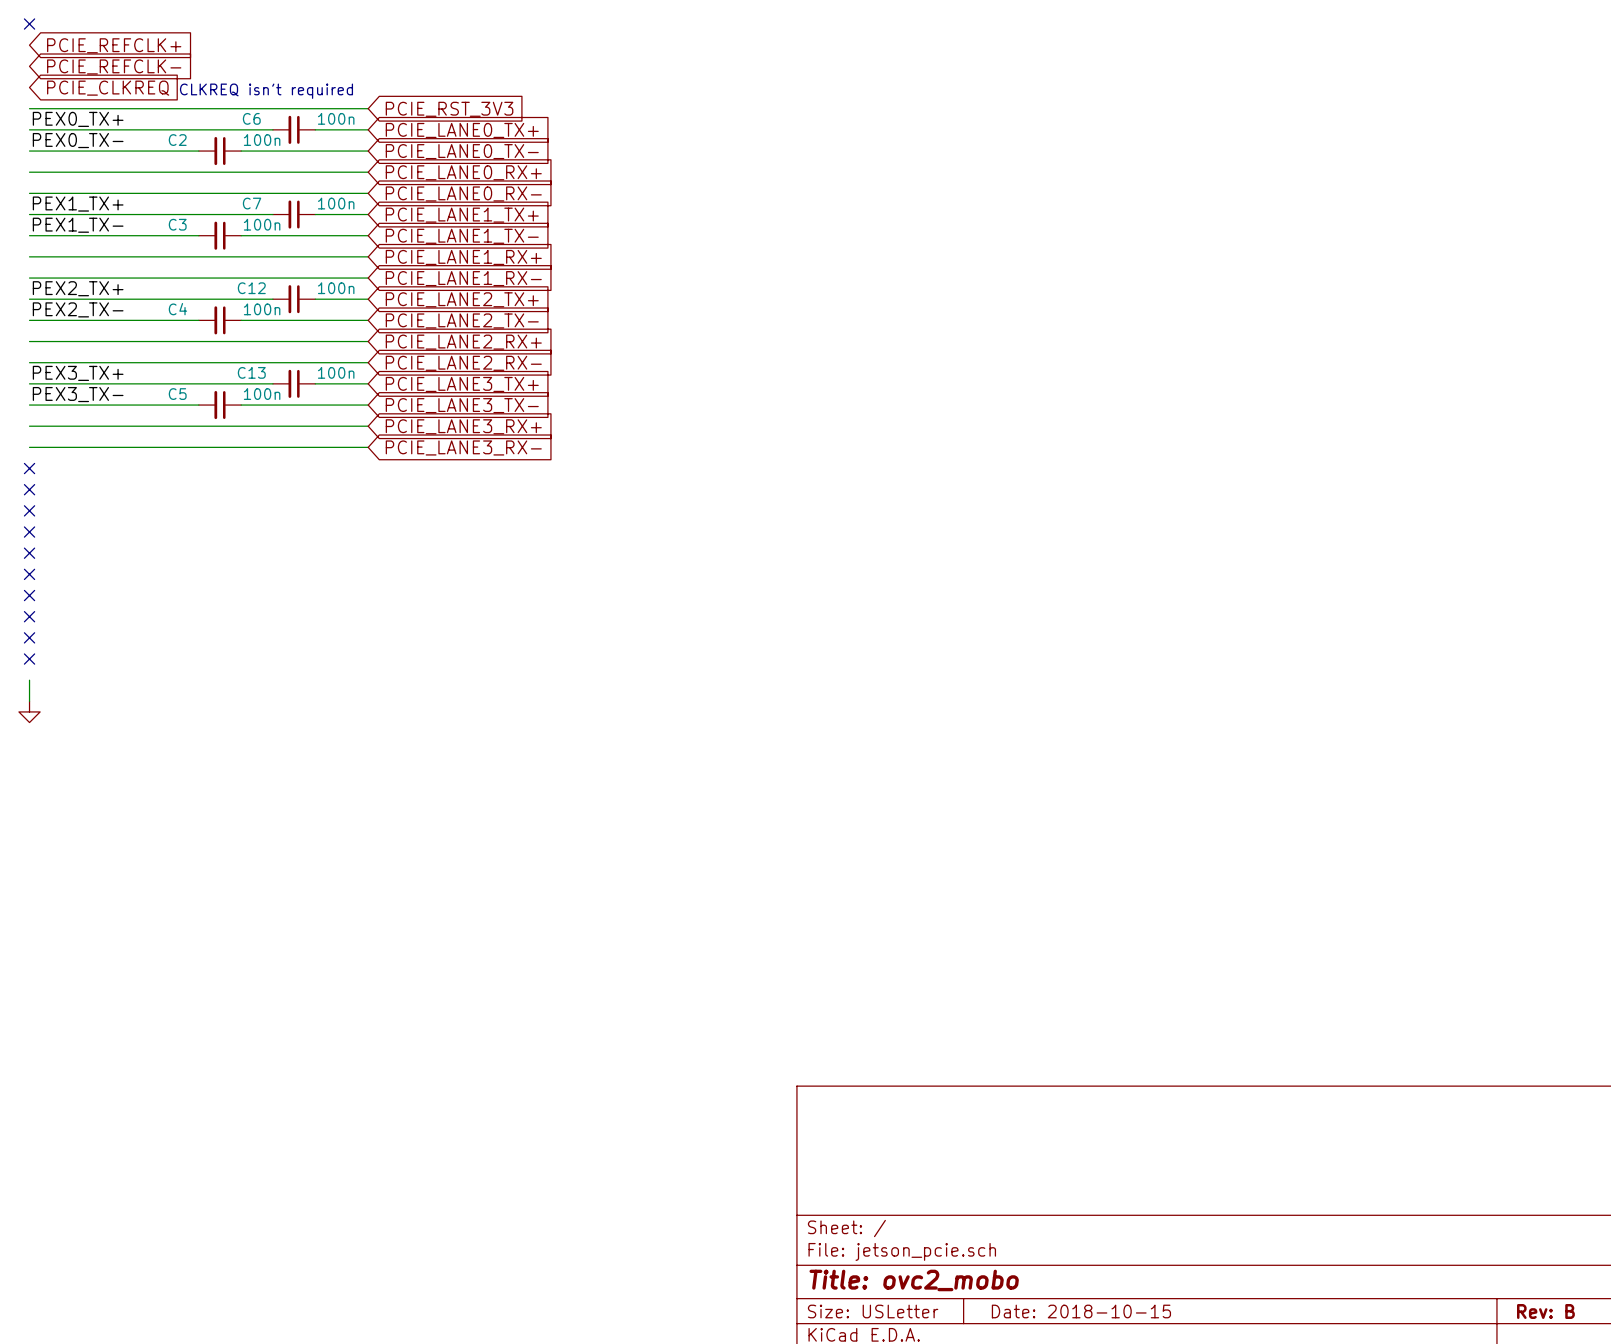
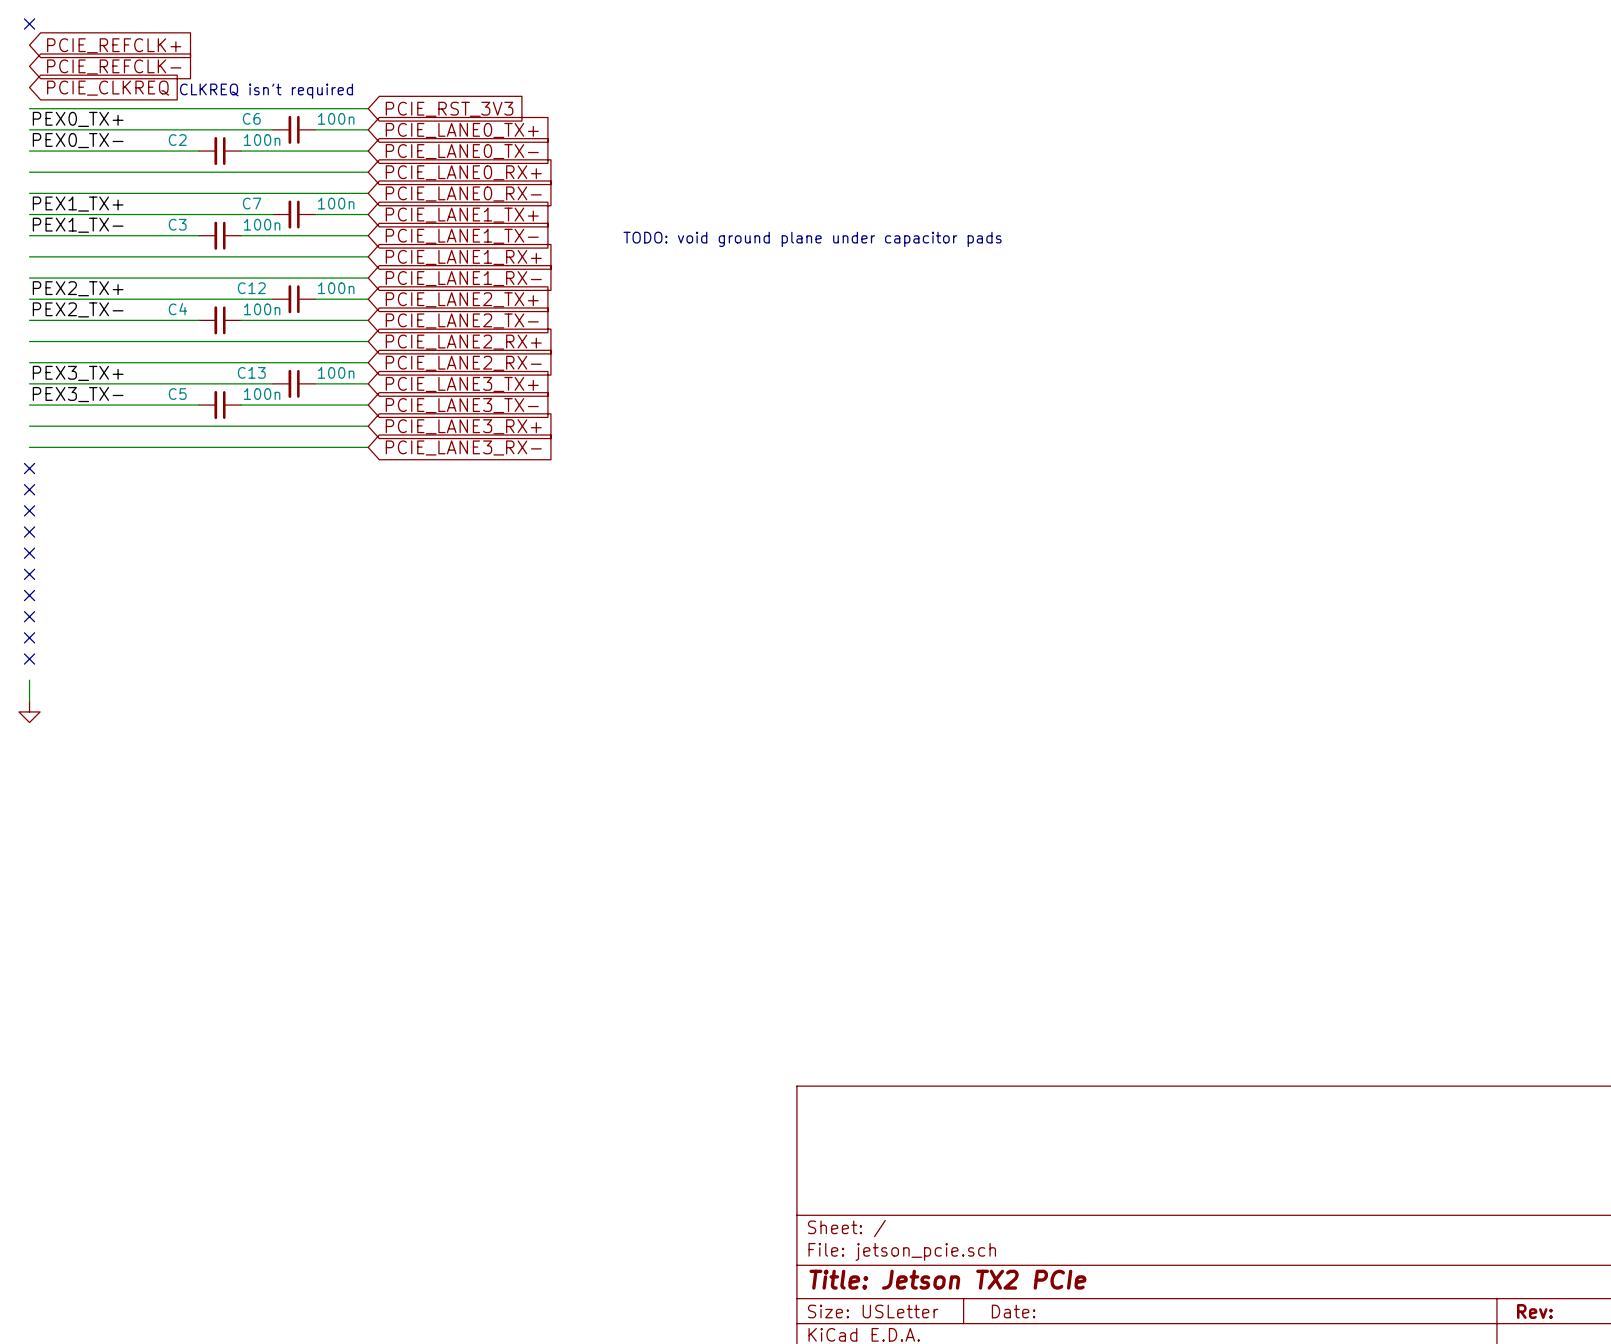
text: none -> TODO: void ground plane under capacitor pads (812, 239)
title block: Title: ovc2_mobo (914, 1280) -> Title: Jetson TX2 PCIe (947, 1279)
title block: Date: 2018-10-15 (1081, 1311) -> Date: (1013, 1311)
title block: Rev: B (1545, 1311) -> Rev: (1534, 1311)

